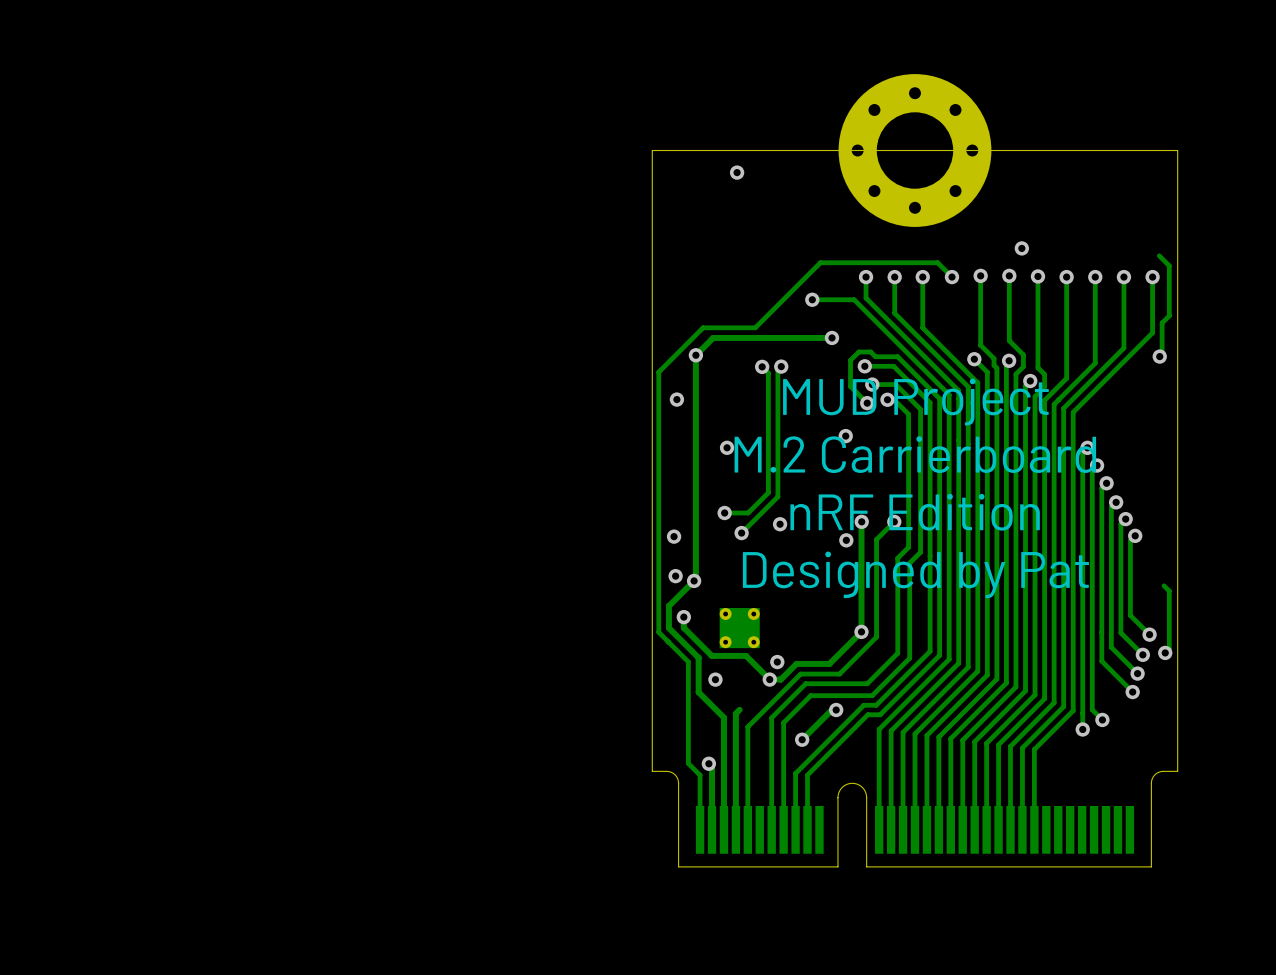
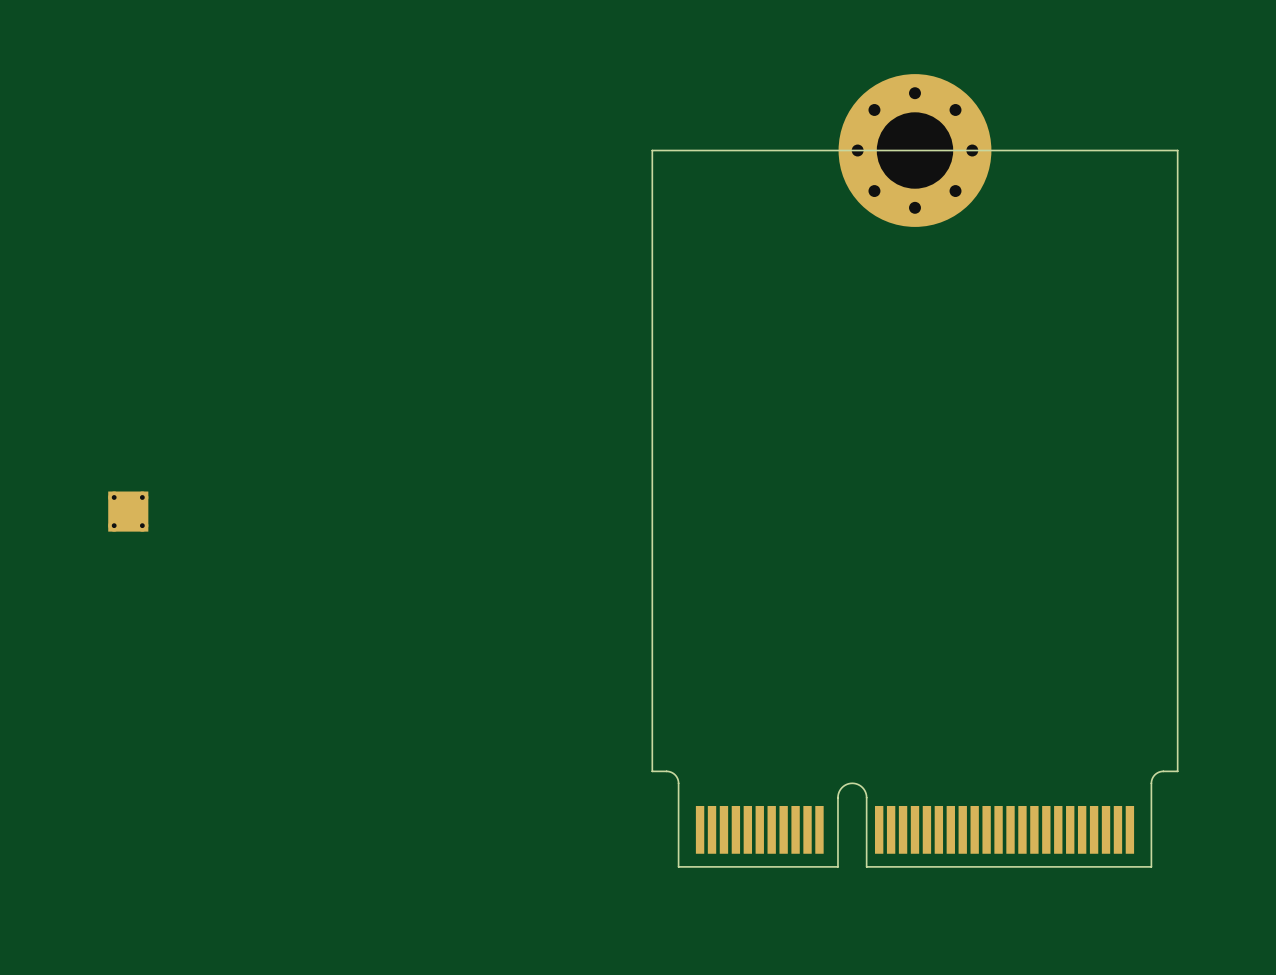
via: (737, 172) -> none
via: (1021, 248) -> none
track: (1159, 255) (1169, 265) (1169, 315) (1162, 323) (1162, 354) (1159, 356) -> none
track: (980, 275) (980, 345) (994, 358) (994, 365) (996, 368) (996, 679) (938, 737) (938, 806) -> none
via: (980, 275) -> none
track: (1009, 275) (1009, 340) (1023, 354) (1023, 366) (1015, 374) (1015, 687) (962, 740) (962, 806) -> none
via: (1009, 275) -> none
track: (1037, 276) (1037, 367) (1044, 374) (1044, 386) (1035, 396) (1035, 694) (986, 743) (986, 806) -> none
via: (1037, 276) -> none
track: (866, 277) (866, 298) (958, 390) (958, 663) (891, 730) (891, 806) -> none
via: (866, 277) -> none
track: (894, 277) (894, 313) (968, 386) (968, 667) (903, 732) (903, 806) -> none
via: (894, 277) -> none
track: (922, 277) (922, 327) (977, 382) (977, 671) (914, 734) (914, 806) -> none
via: (922, 277) -> none
track: (952, 277) (937, 262) (820, 262) (755, 327) (703, 327) (658, 372) (658, 632) (688, 661) (688, 763) (700, 775) (700, 829) -> none
via: (952, 277) -> none
track: (1066, 277) (1066, 378) (1044, 400) (1044, 698) (998, 744) (998, 806) -> none
via: (1066, 277) -> none
track: (1095, 277) (1095, 363) (1054, 404) (1054, 702) (1010, 746) (1010, 806) -> none
via: (1095, 277) -> none
track: (1123, 277) (1123, 348) (1063, 408) (1063, 706) (1022, 747) (1022, 806) -> none
via: (1123, 277) -> none
track: (1152, 277) (1152, 332) (1073, 412) (1073, 710) (1034, 749) (1034, 806) -> none
via: (1152, 277) -> none
track: (812, 299) (854, 299) (949, 394) (949, 659) (879, 729) (879, 806) -> none
via: (812, 299) -> none
track: (832, 337) (713, 337) (695, 355) (695, 579) (668, 606) (668, 628) (698, 657) (698, 692) (723, 717) (723, 829) -> none
via: (832, 337) -> none
via: (695, 355) -> none
via: (1159, 356) -> none
track: (974, 359) (987, 372) (987, 675) (926, 735) (926, 806) -> none
via: (974, 359) -> none
track: (1009, 360) (1006, 363) (1006, 683) (950, 738) (950, 806) -> none
via: (1009, 360) -> none
track: (762, 366) (768, 373) (768, 492) (748, 513) (724, 513) -> none
via: (762, 366) -> none
track: (781, 366) (777, 369) (777, 496) (741, 533) -> none
via: (781, 366) -> none
track: (864, 366) (893, 366) (930, 402) (930, 651) (876, 705) (863, 705) (795, 773) (795, 829) -> none
via: (864, 366) -> none
track: (1030, 381) (1025, 385) (1025, 690) (974, 741) (974, 806) -> none
via: (1030, 381) -> none
track: (872, 384) (895, 384) (920, 409) (920, 552) (909, 563) (909, 658) (872, 695) (810, 695) (783, 722) (783, 829) -> none
via: (872, 384) -> none
via: (676, 399) -> none
track: (887, 399) (894, 399) (908, 414) (908, 547) (897, 558) (897, 653) (867, 683) (805, 683) (771, 717) (771, 829) -> none
via: (887, 399) -> none
text: MUD Project (915, 402) -> none
track: (867, 403) (850, 386) (850, 360) (858, 351) (870, 351) (875, 356) (897, 356) (939, 398) (939, 655) (880, 714) (867, 714) (807, 775) (807, 806) -> none
via: (867, 403) -> none
via: (845, 436) -> none
via: (727, 447) -> none
track: (1087, 447) (1082, 452) (1082, 729) -> none
via: (1087, 447) -> none
text: M.2 Carrierboard (915, 454) -> none
track: (1097, 465) (1092, 470) (1092, 709) (1102, 719) -> none
via: (1097, 465) -> none
track: (1106, 483) (1101, 488) (1101, 661) (1132, 692) -> none
via: (1106, 483) -> none
track: (1116, 502) (1111, 507) (1111, 647) (1137, 673) -> none
via: (1116, 502) -> none
part: none -> (128, 511)
text: nRF Edition (915, 512) -> none
via: (724, 513) -> none
track: (1125, 519) (1120, 523) (1120, 632) (1142, 654) -> none
via: (1125, 519) -> none
via: (861, 521) -> none
track: (894, 521) (876, 539) (876, 637) (839, 674) (800, 674) (747, 726) (747, 829) -> none
via: (894, 521) -> none
track: (861, 522) (861, 631) (829, 663) (796, 663) (780, 679) (769, 679) (746, 655) (711, 655) (683, 627) (683, 617) -> none
via: (780, 524) -> none
via: (741, 533) -> none
track: (1135, 535) (1130, 540) (1130, 615) (1149, 634) -> none
via: (1135, 535) -> none
via: (674, 536) -> none
via: (846, 540) -> none
text: Designed by Pat (915, 574) -> none
via: (675, 576) -> none
via: (694, 580) -> none
track: (1164, 585) (1169, 591) (1169, 648) (1165, 652) -> none
via: (683, 617) -> none
part: (739, 628) -> none
via: (861, 631) -> none
via: (1149, 634) -> none
via: (1165, 652) -> none
via: (1142, 654) -> none
via: (777, 662) -> none
via: (1137, 673) -> none
via: (715, 679) -> none
via: (769, 679) -> none
via: (1132, 692) -> none
track: (739, 709) (735, 713) (735, 829) -> none
track: (836, 709) (831, 709) (802, 739) -> none
via: (836, 709) -> none
via: (1102, 719) -> none
via: (1082, 729) -> none
via: (802, 739) -> none
track: (706, 760) (712, 765) (712, 829) -> none
via: (708, 763) -> none

